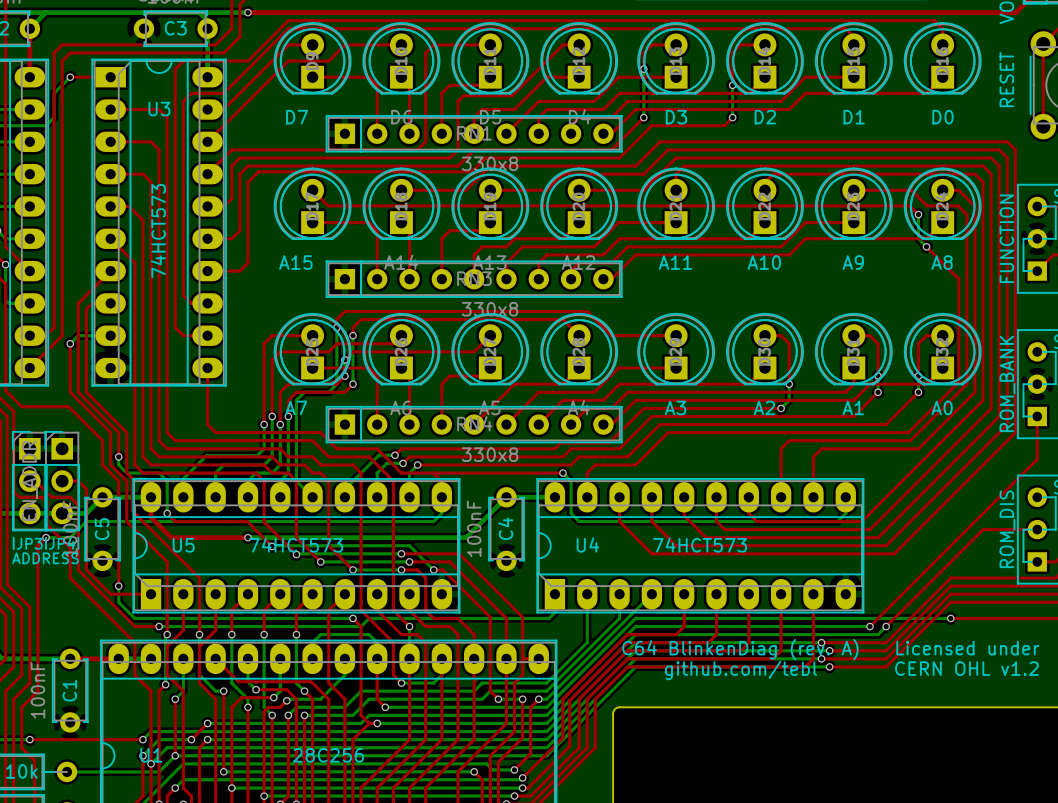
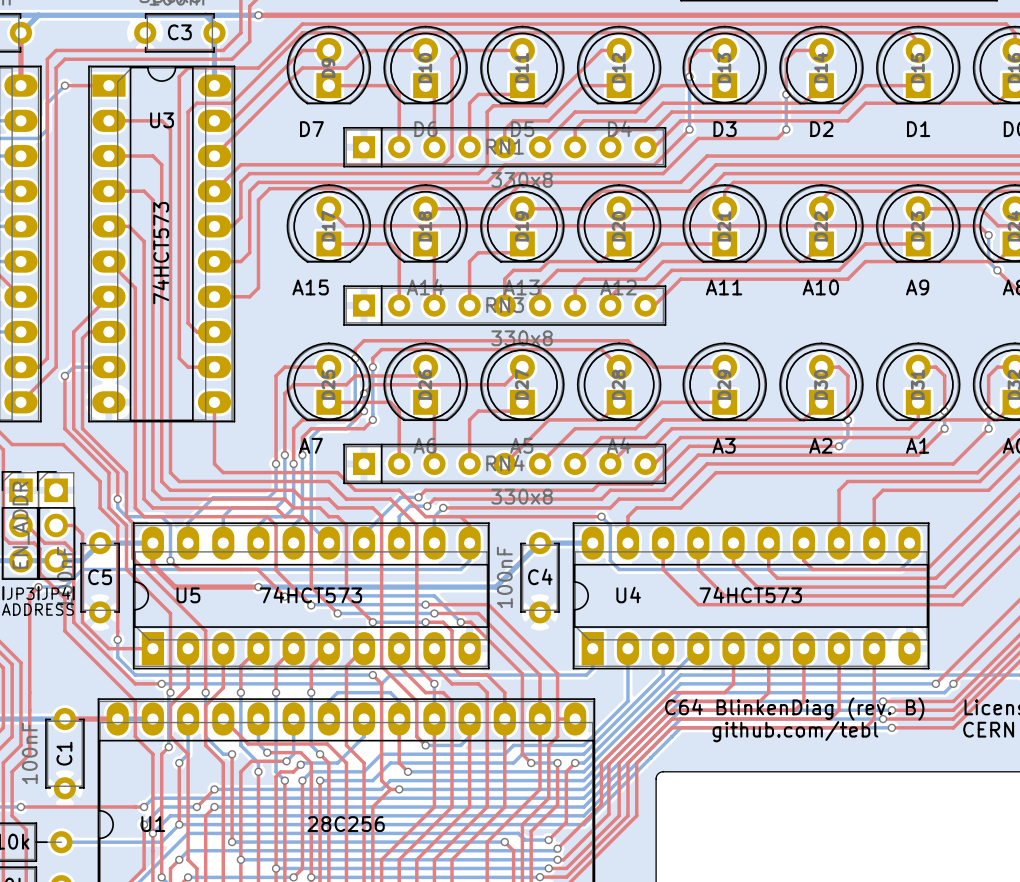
C4 name rotation: 0° (505, 528) -> 90° clockwise (540, 576)
C5 name rotation: 0° (102, 529) -> 90° clockwise (100, 577)
text: C64 BlinkenDiag (rev. A) (740, 649) -> C64 BlinkenDiag (rev. B) (794, 709)

